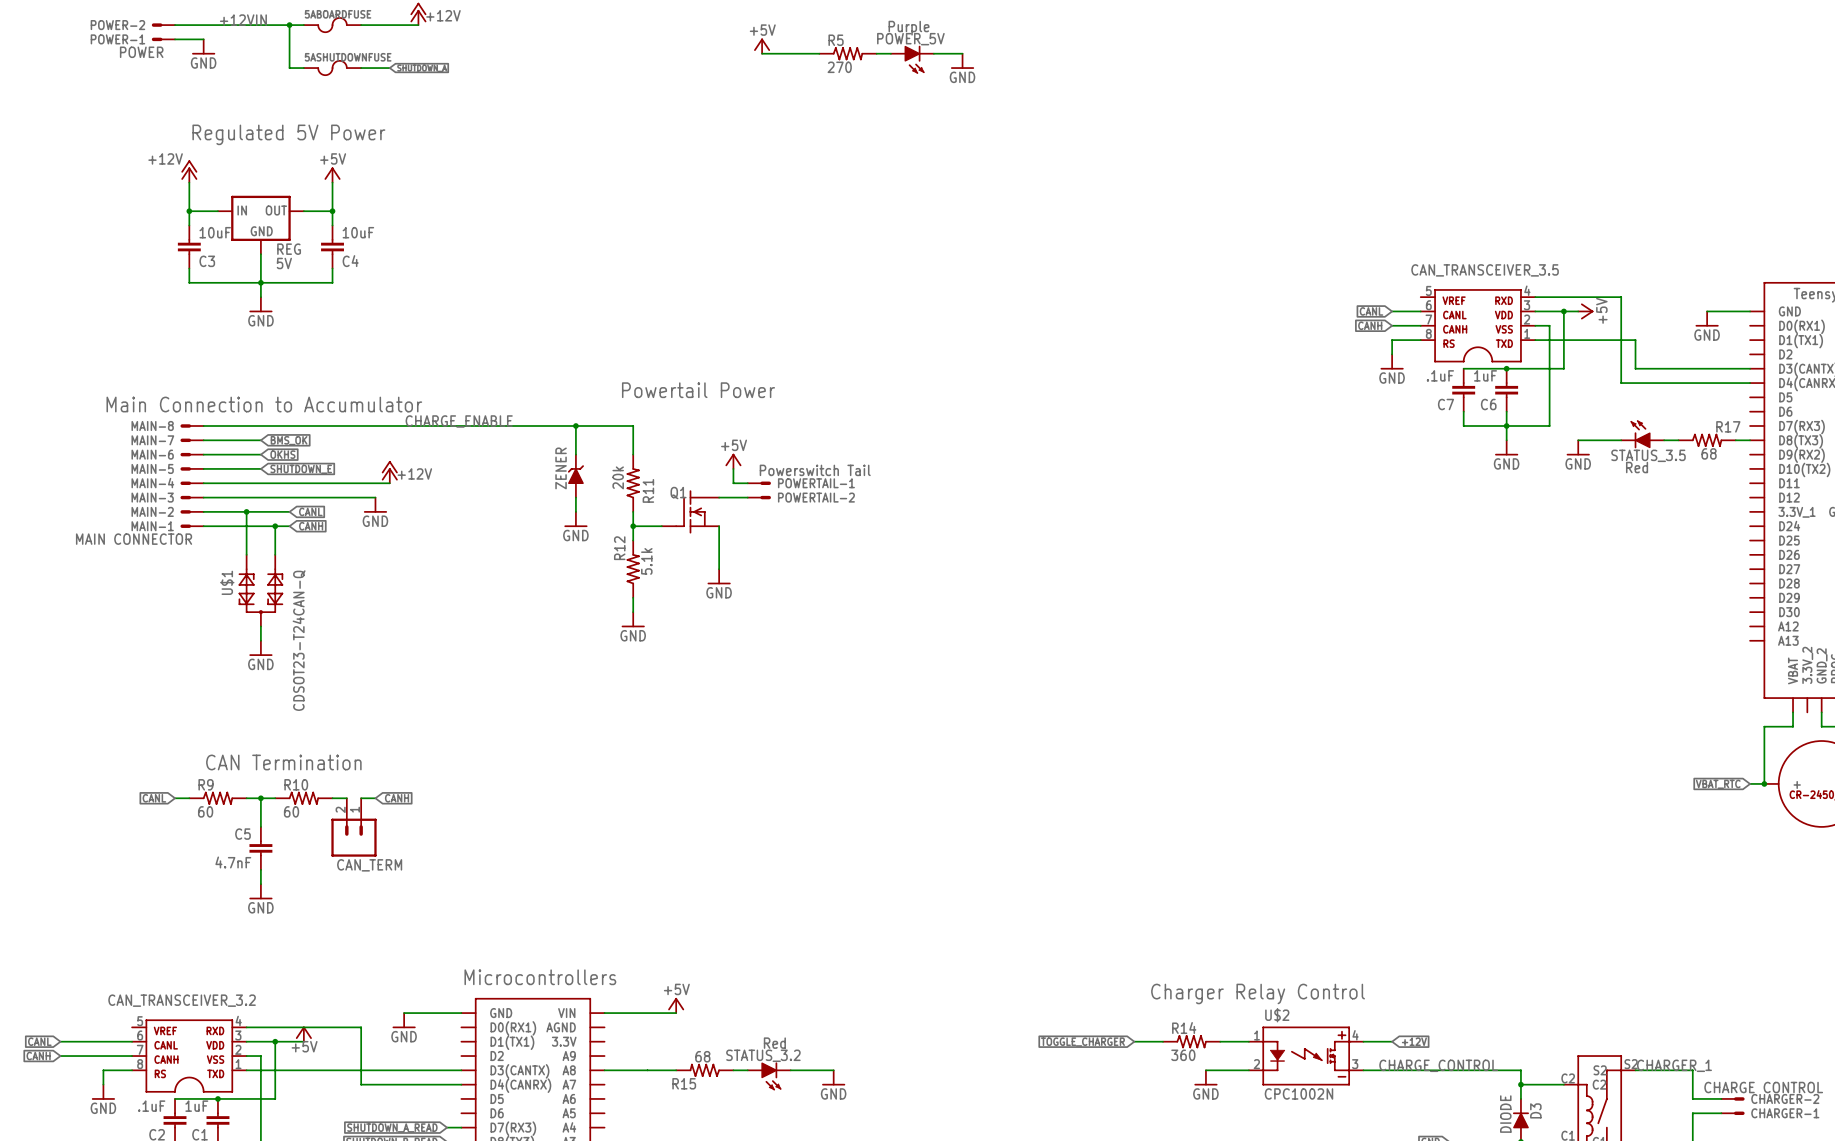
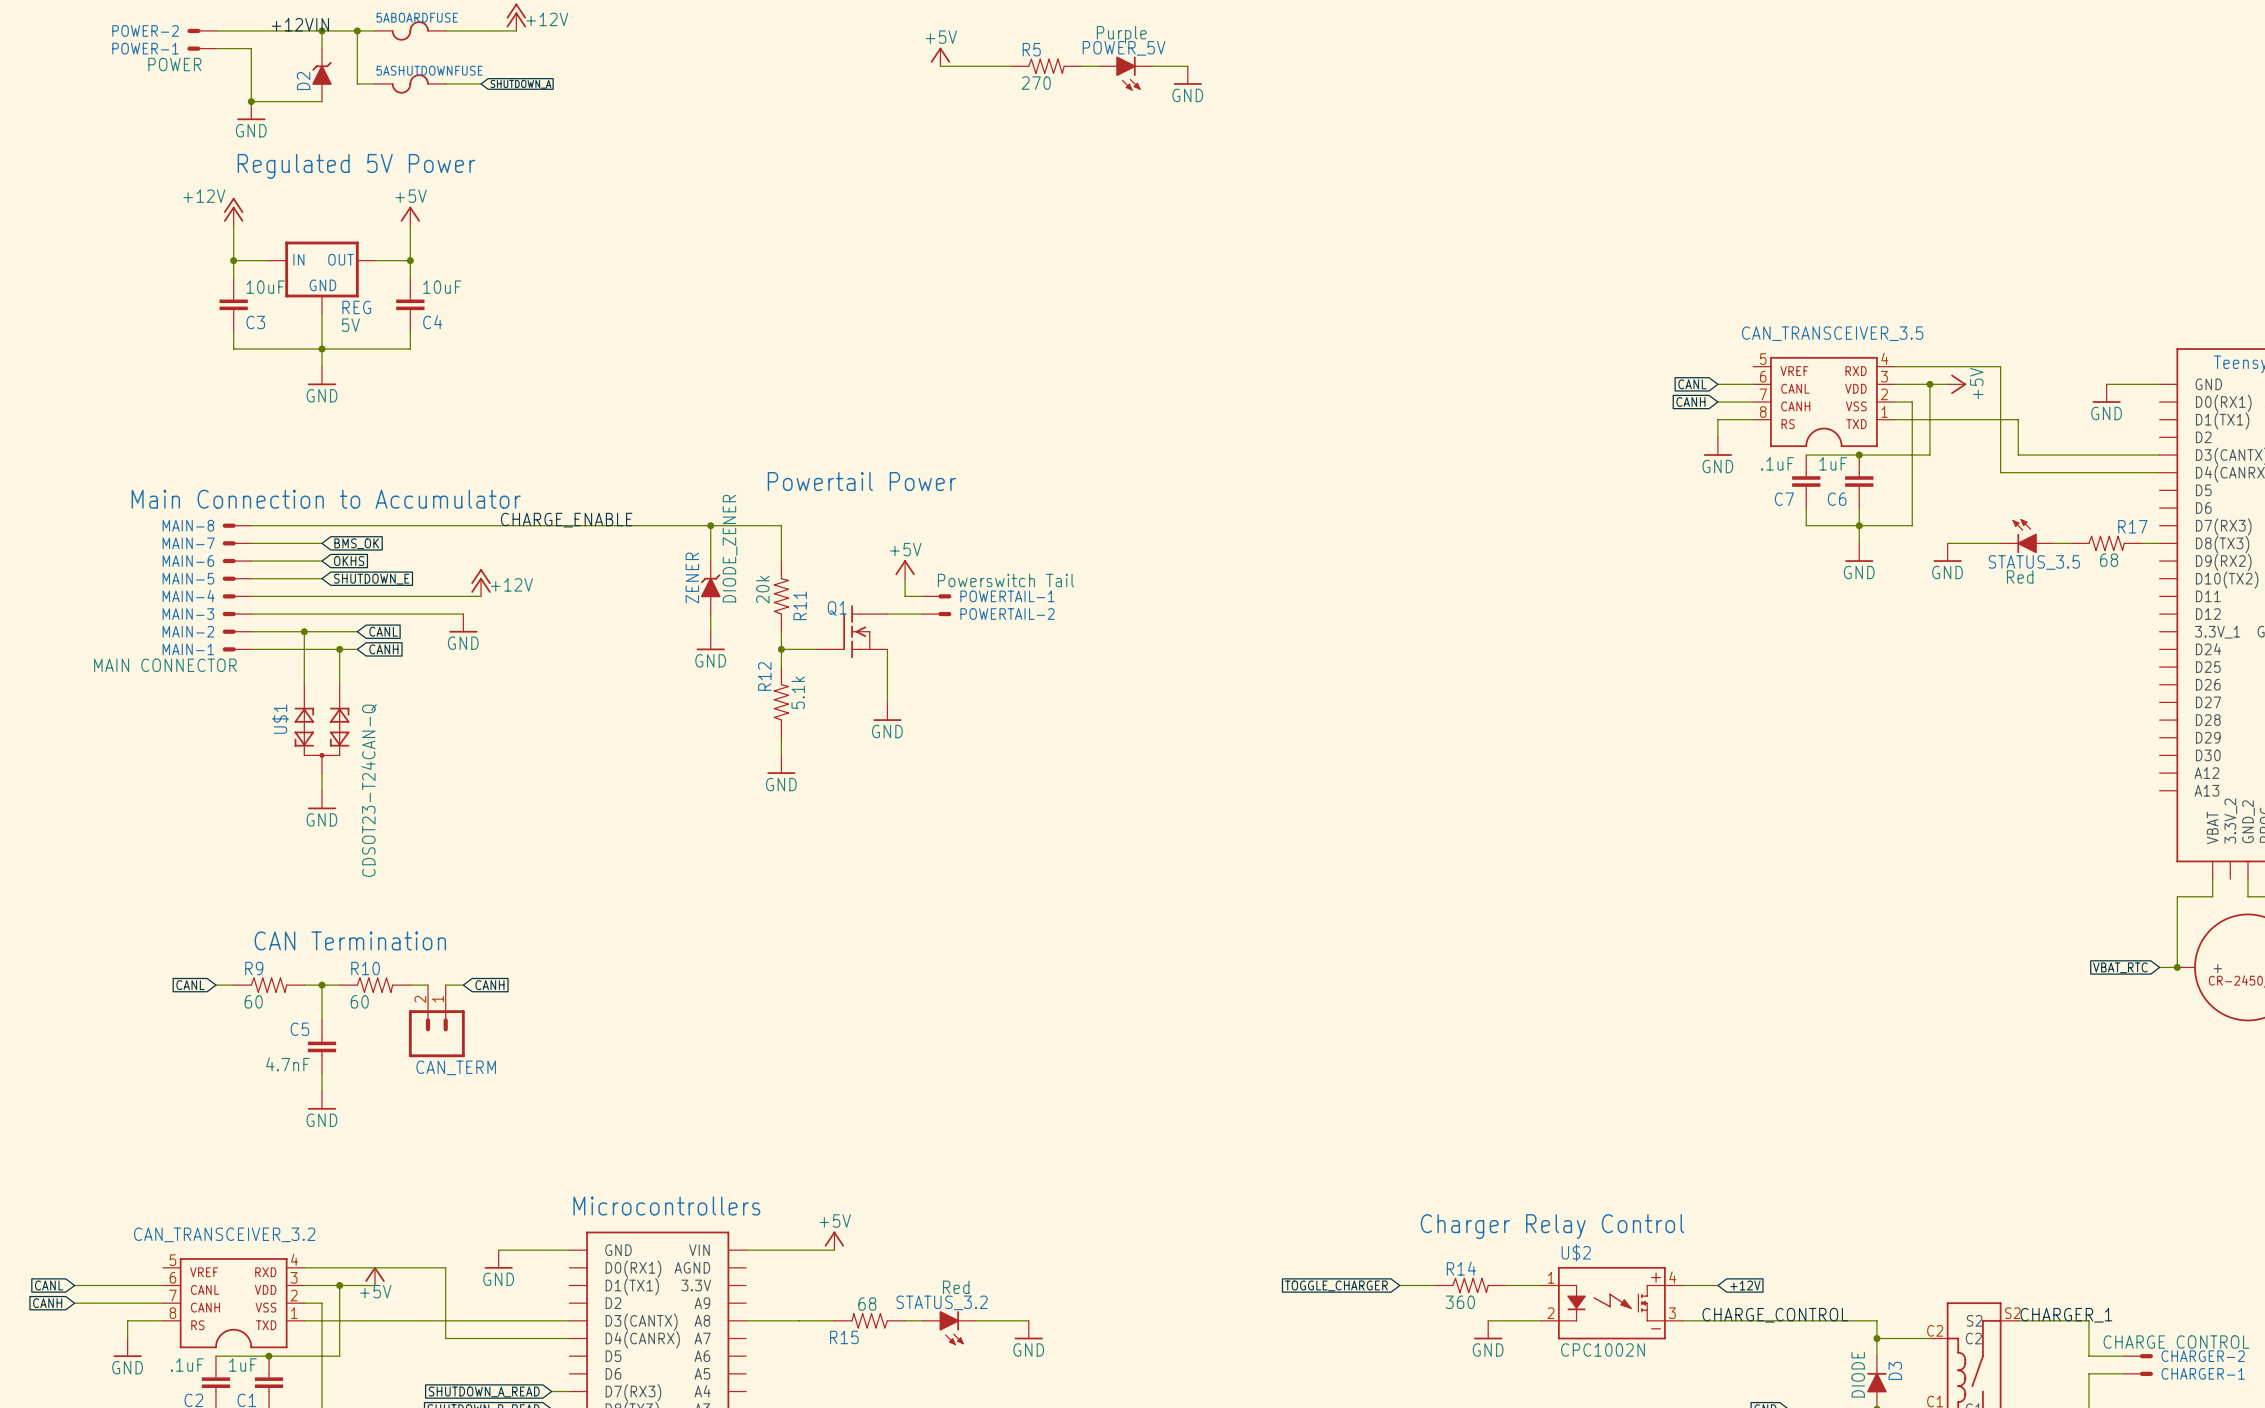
wire: none -> (321, 30) (321, 48)
junction: none -> (321, 30)
wire: none -> (251, 48) (251, 101) (321, 101)
power symbol position: GND (203, 46) -> GND (251, 110)
D2: none -> (321, 75)
junction: none -> (251, 101)
ZENER value: none -> DIODE_ZENER (730, 548)

